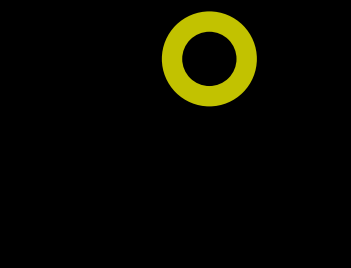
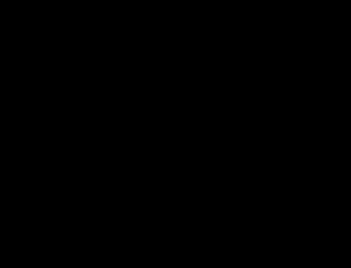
part: (209, 58) -> none

